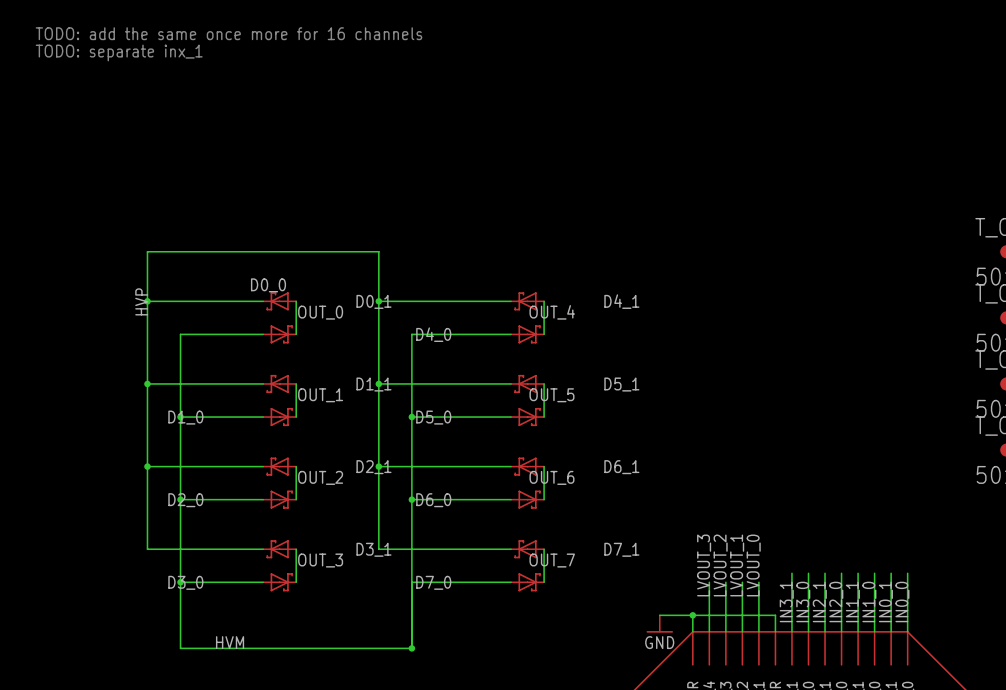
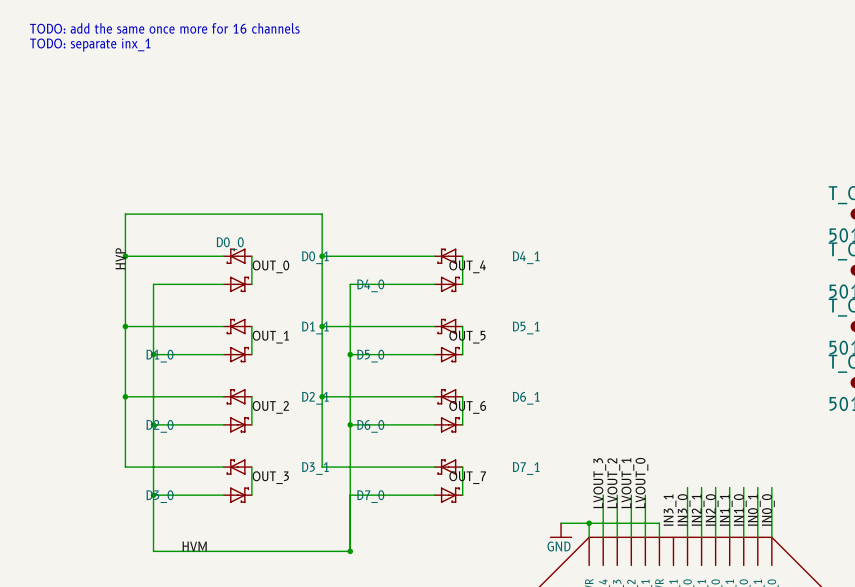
wire: (791, 573) (791, 631) -> none

